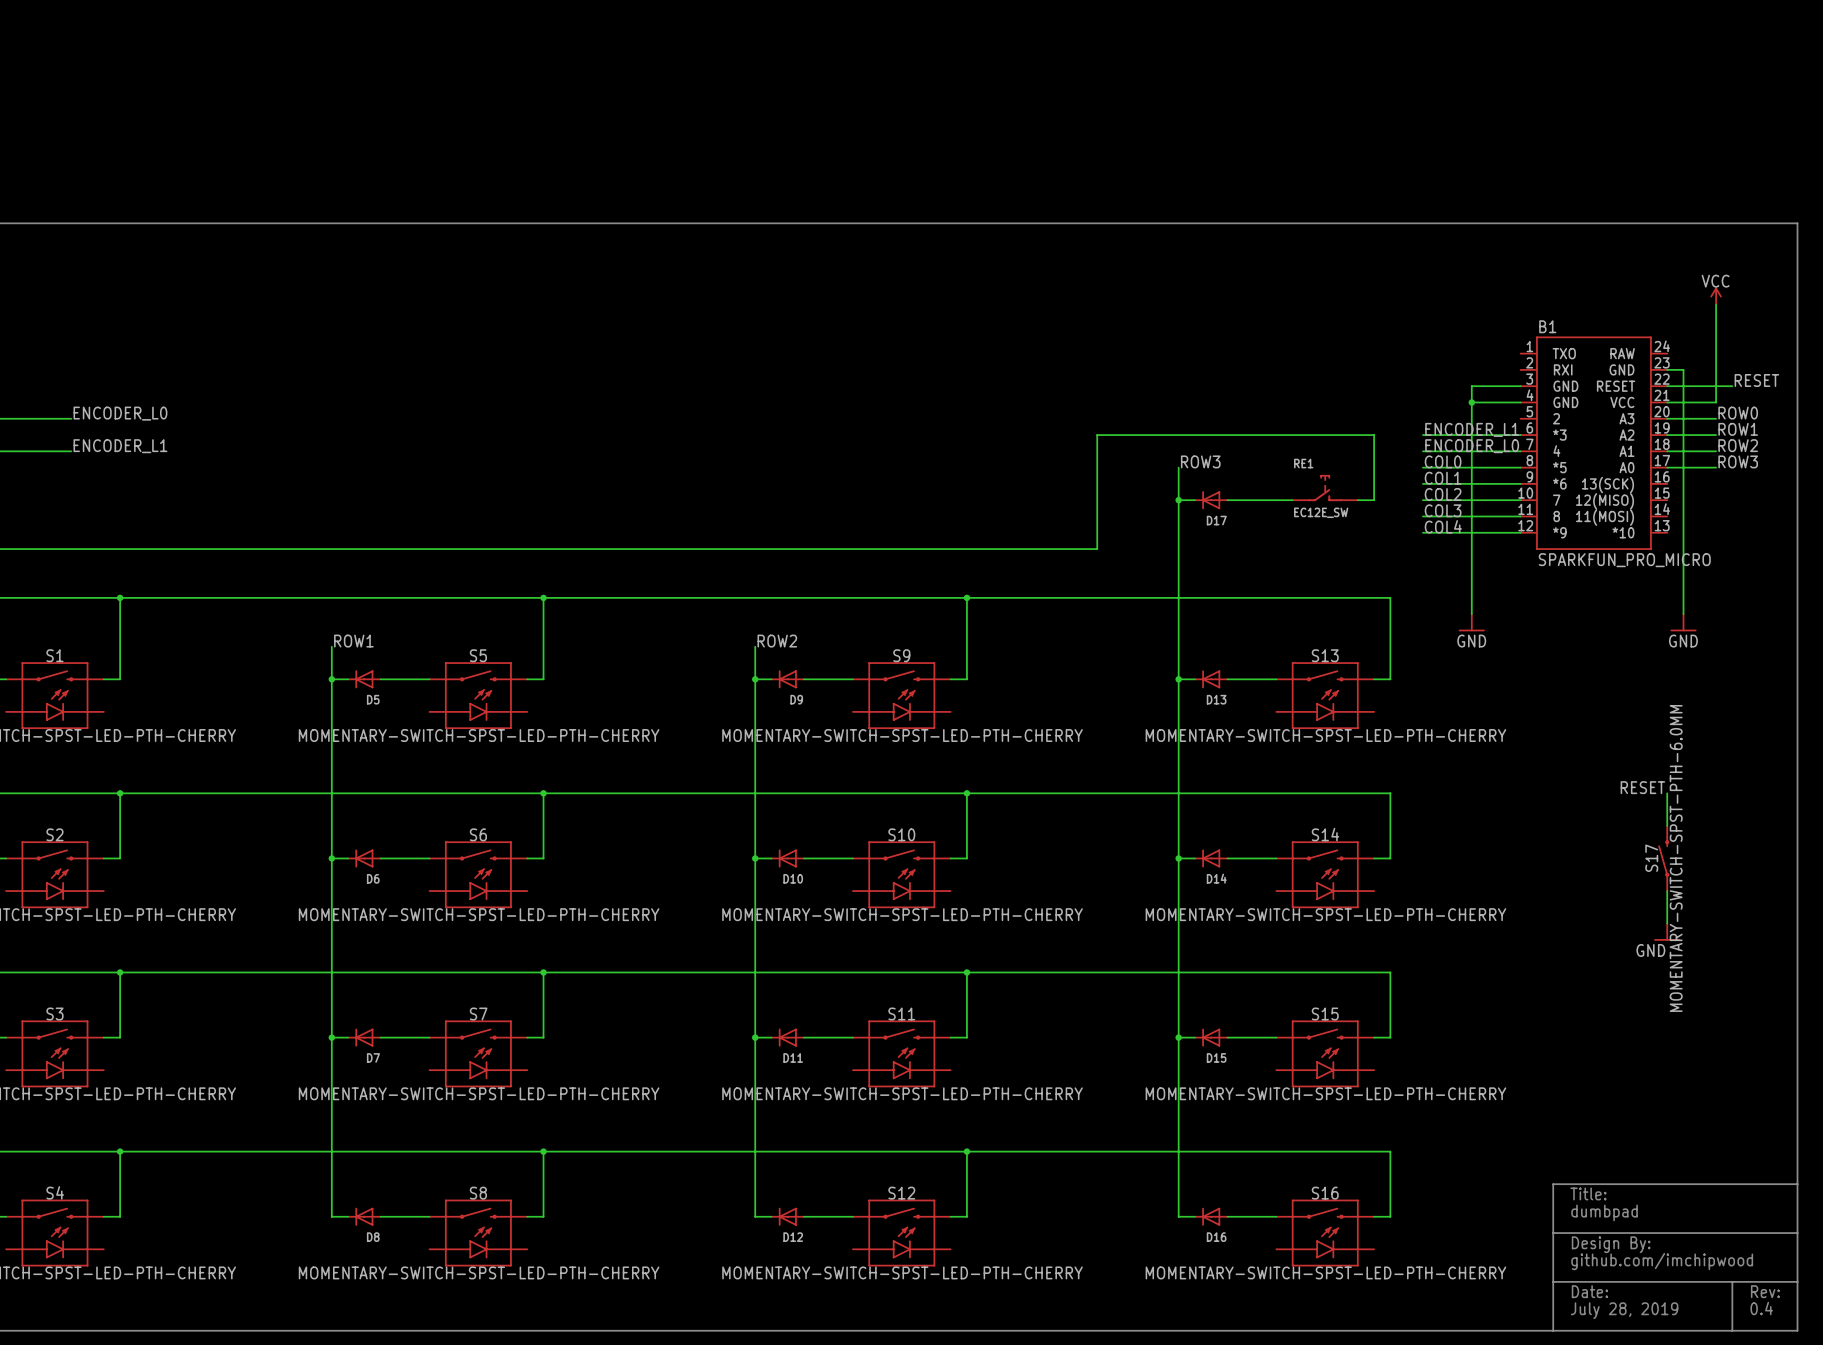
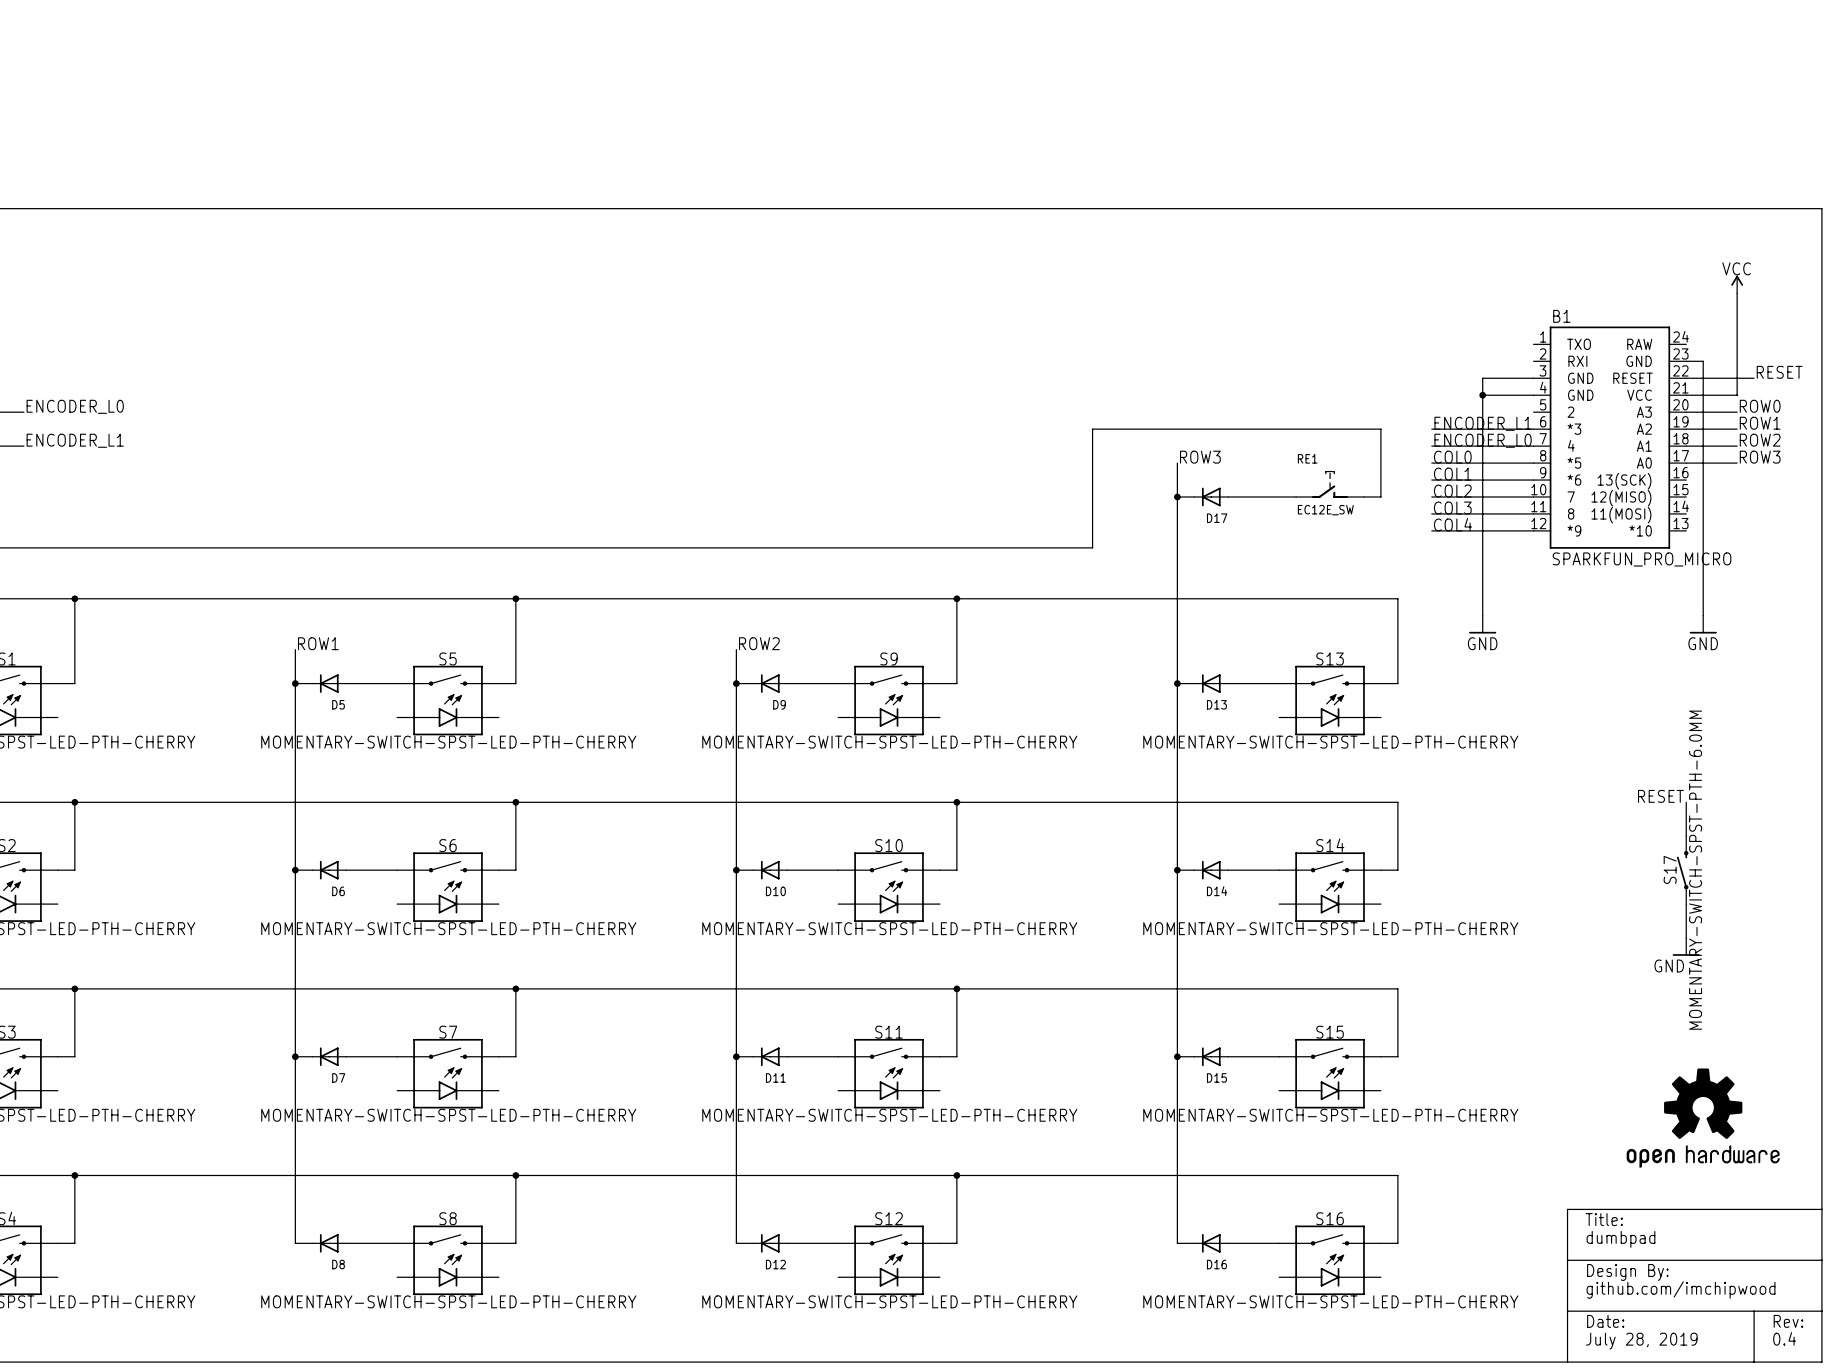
part: none -> (1703, 1118)

